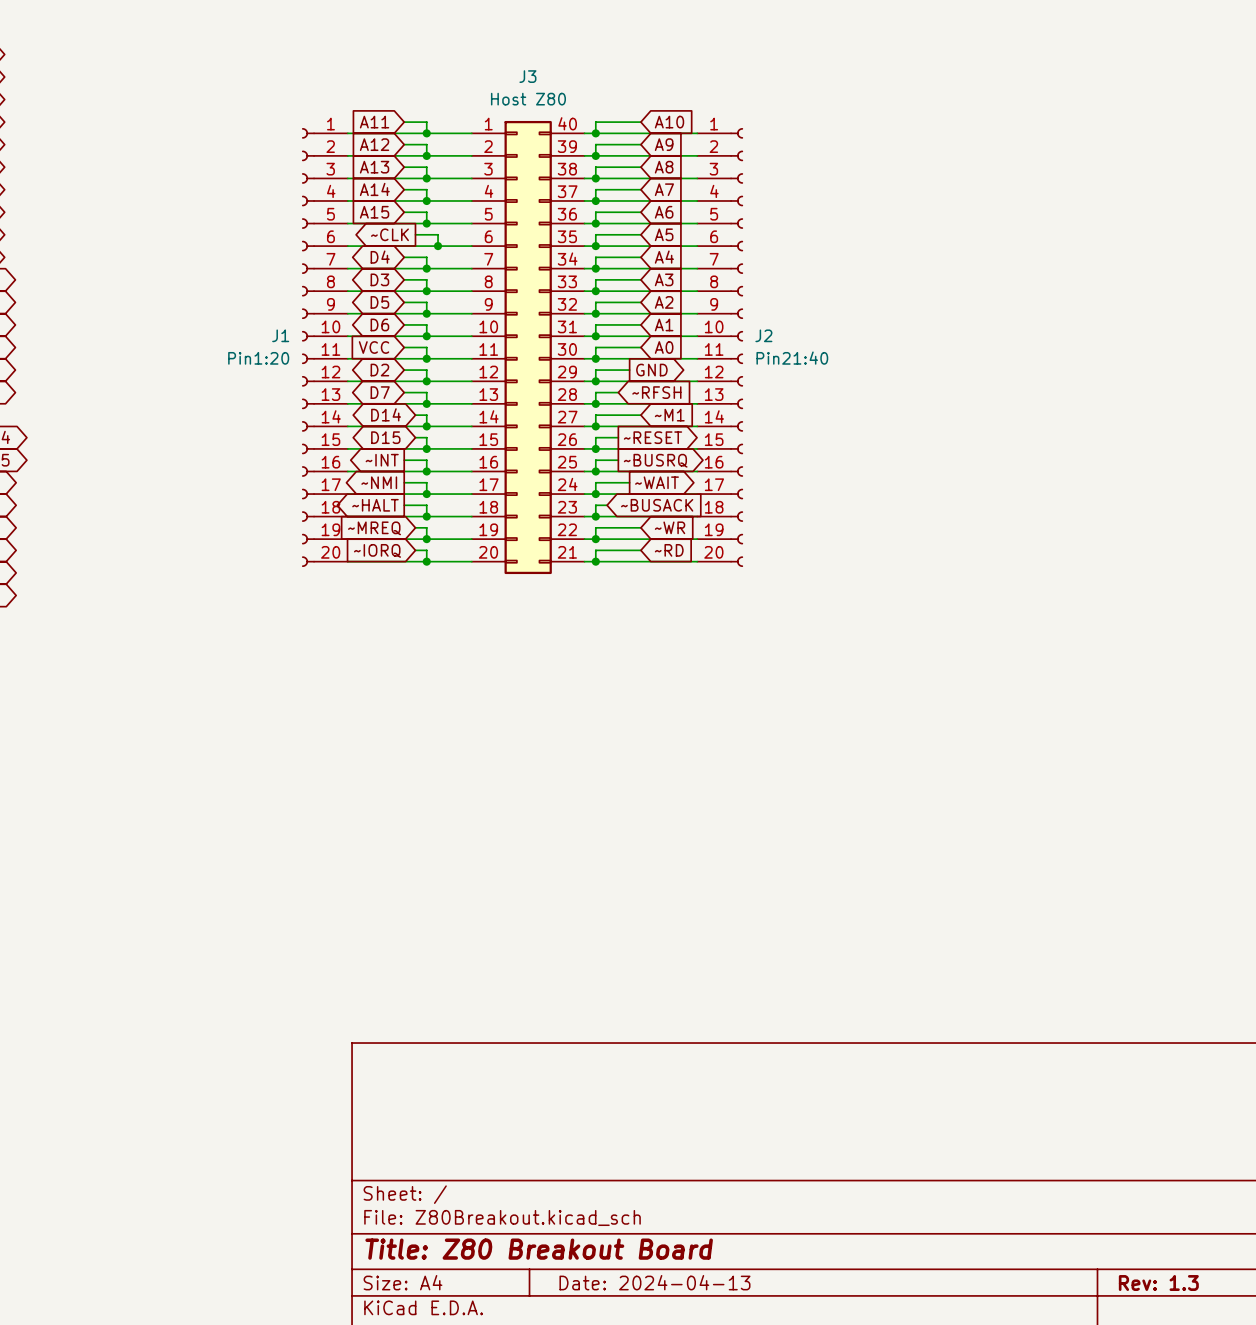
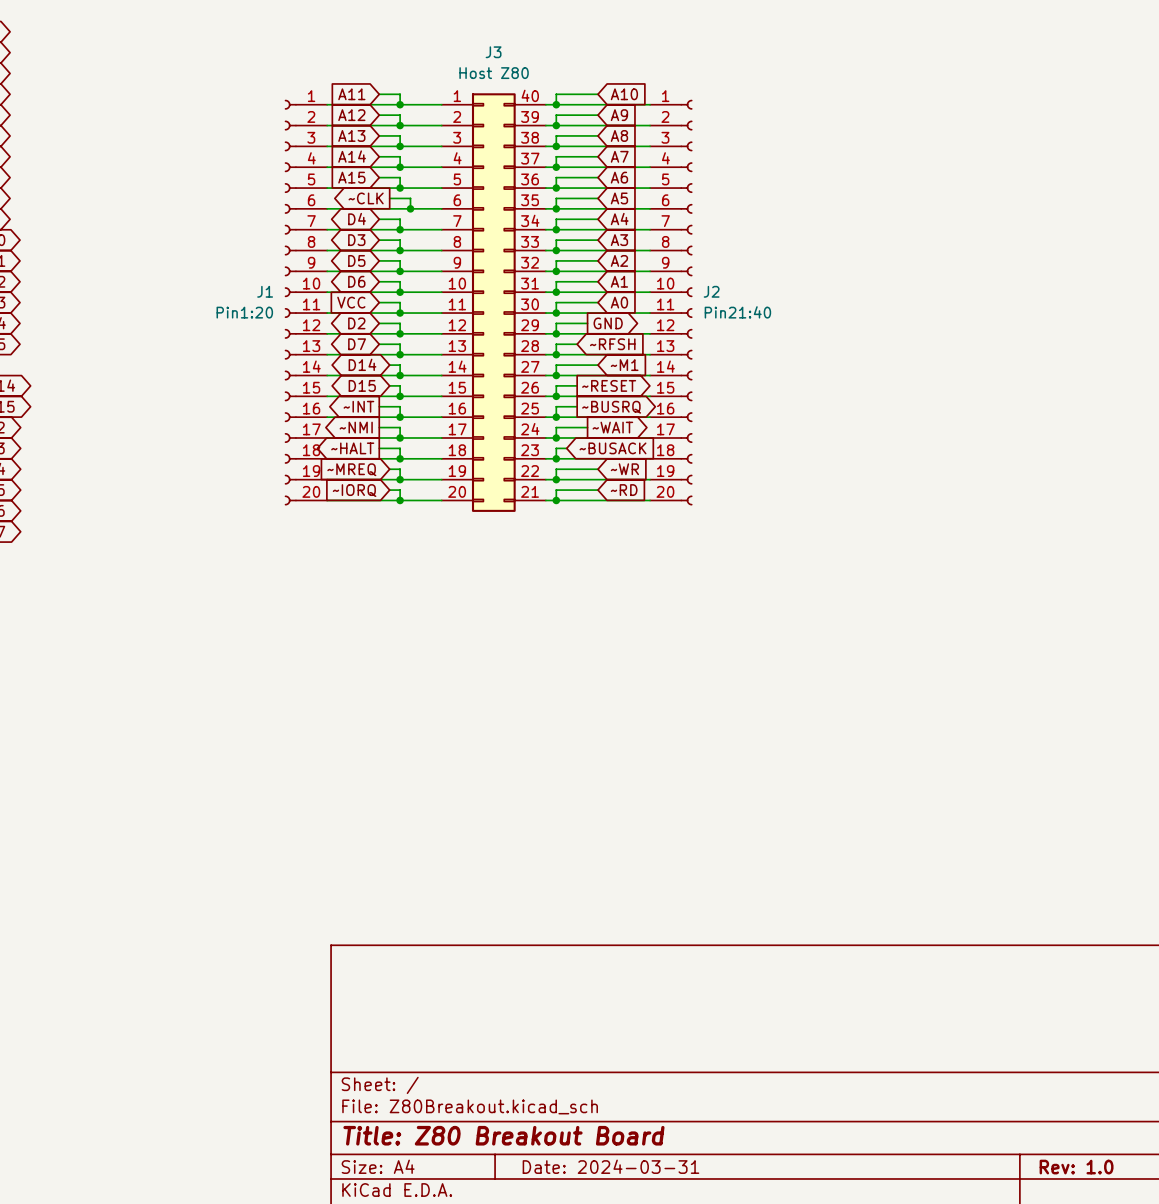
title block: Date: 2024-04-13 (654, 1282) -> Date: 2024-03-31 (610, 1166)
title block: Rev: 1.3 (1158, 1283) -> Rev: 1.0 (1076, 1167)

